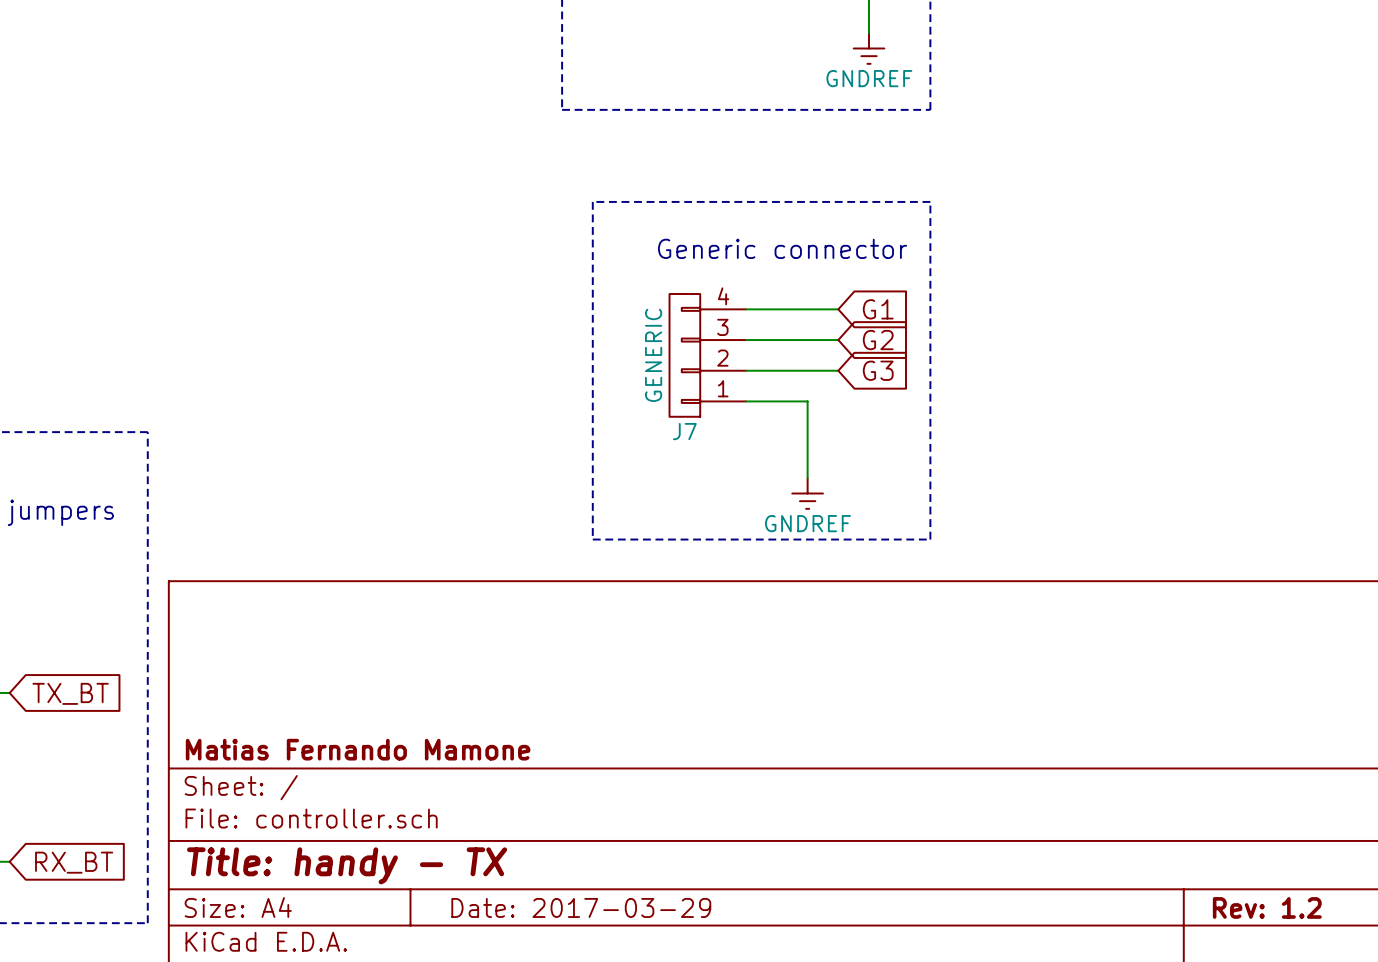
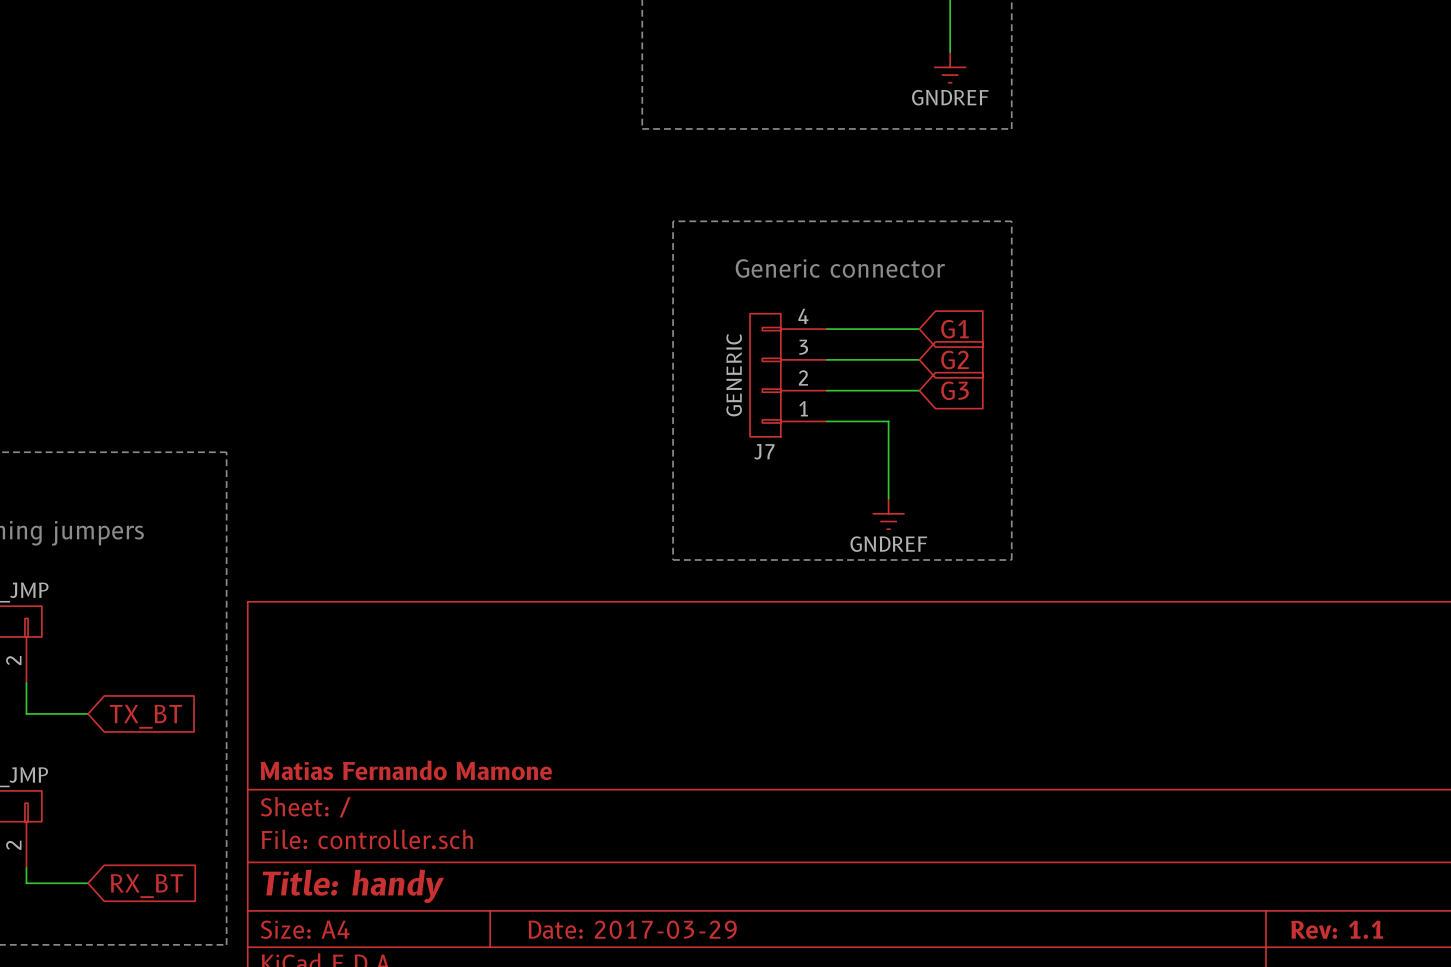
title block: Title: handy - TX (347, 865) -> Title: handy (353, 886)
title block: Rev: 1.2 (1267, 907) -> Rev: 1.1 (1337, 929)

